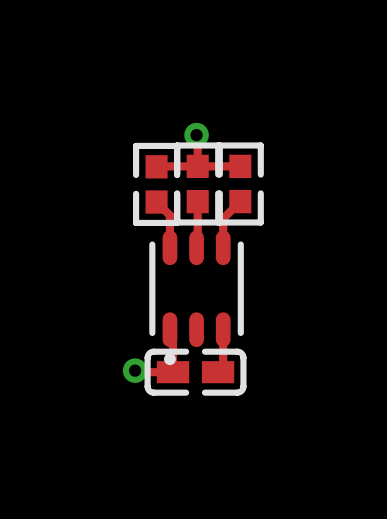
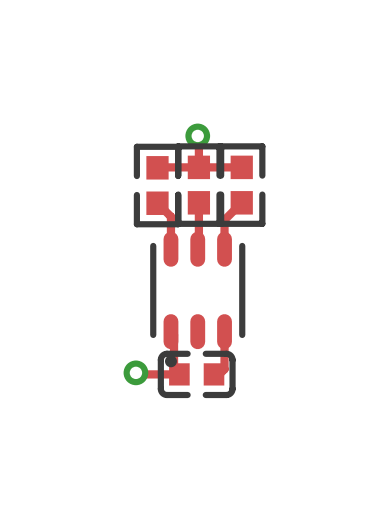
part footprint: [144, 348, 247, 396] -> [157, 350, 236, 399]

